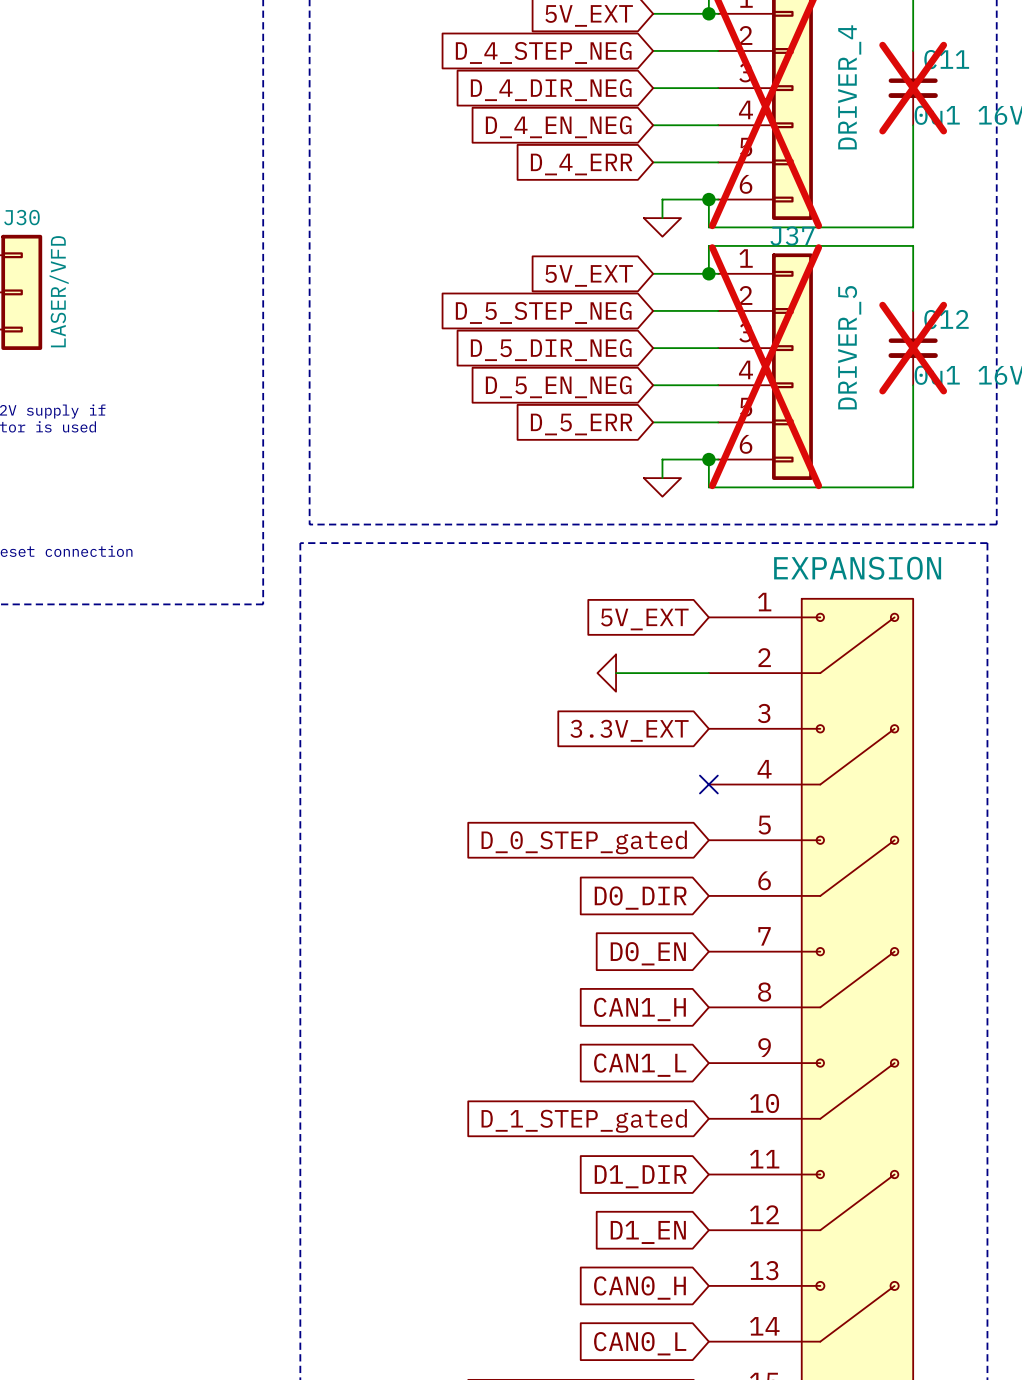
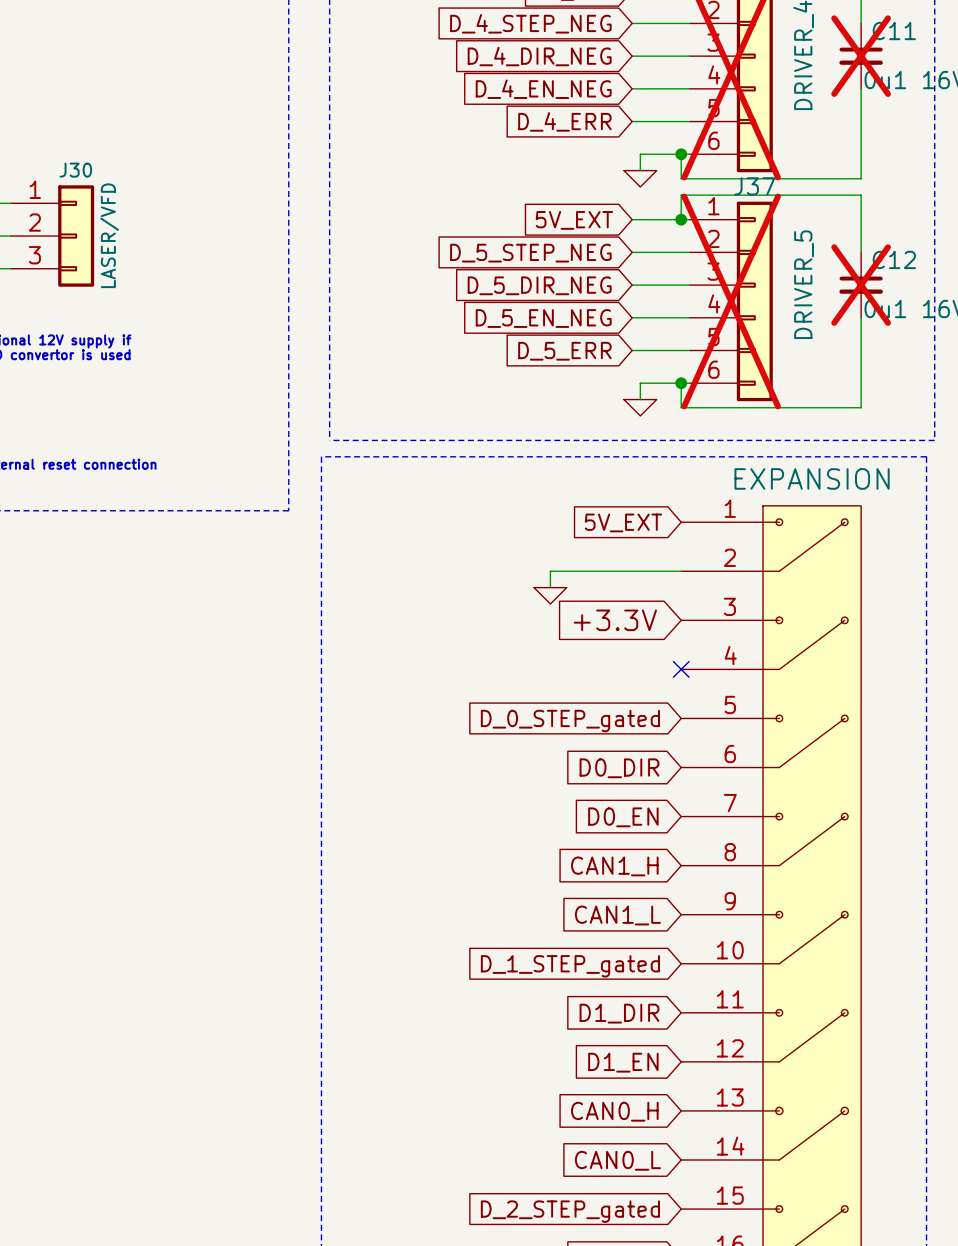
power symbol rotation: 0° (606, 673) -> 90° counterclockwise (550, 595)
power symbol position: (606, 673) -> (550, 595)
wire: none -> (599, 571) (550, 571) (550, 587)
global label: 3.3V_EXT (629, 730) -> +3.3V (615, 620)

